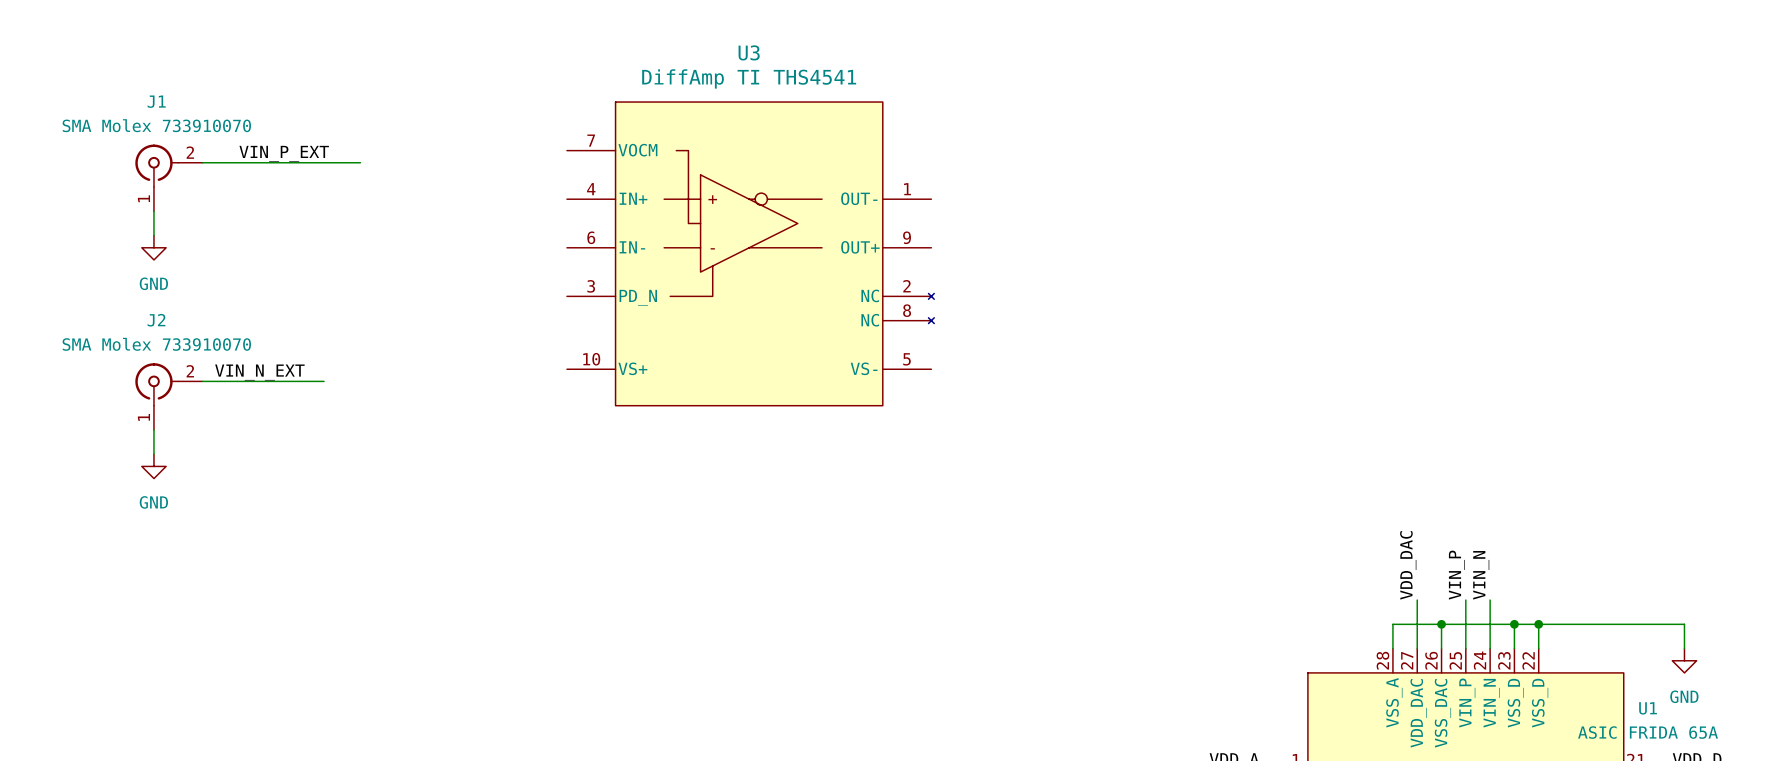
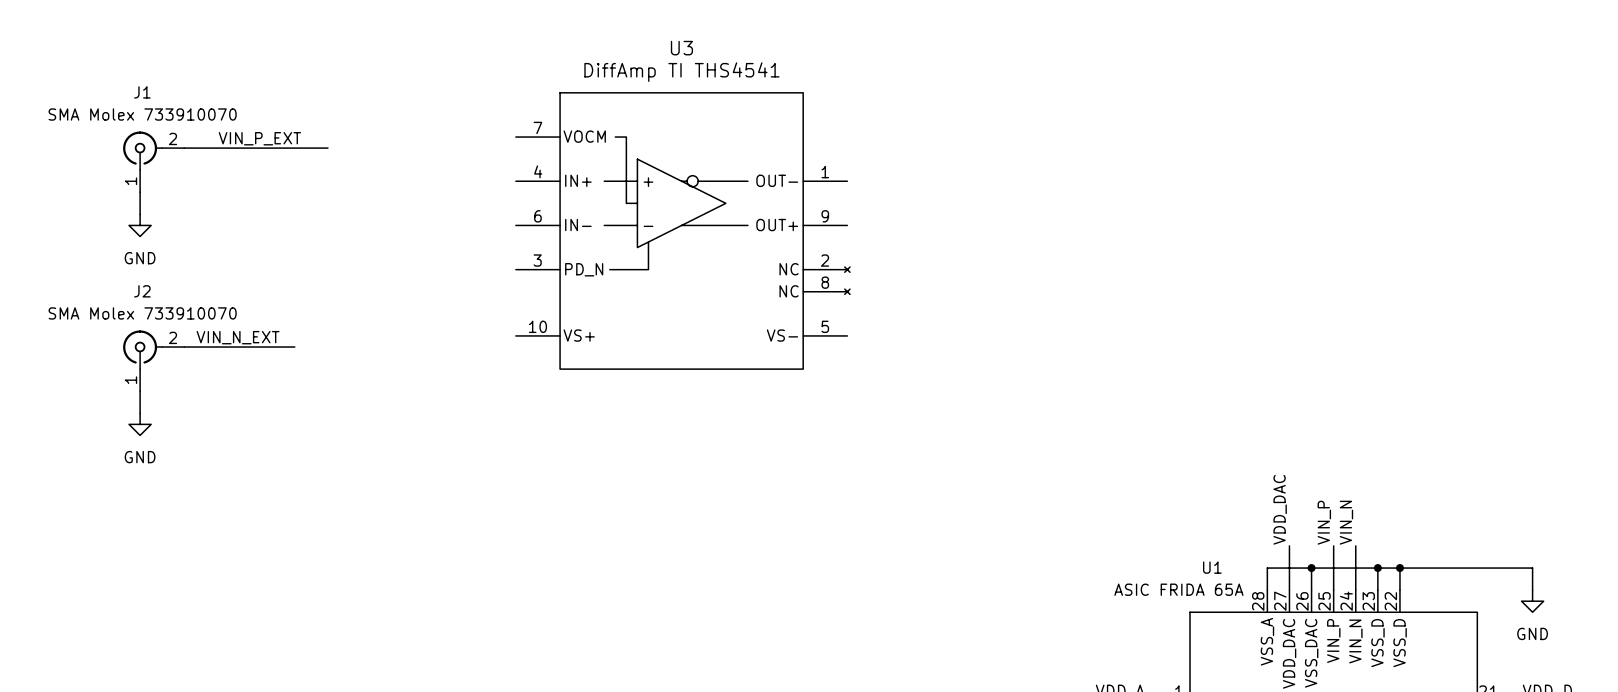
U1 name position: U1 (1648, 708) -> U1 (1212, 567)
U1 value position: ASIC FRIDA 65A (1648, 732) -> ASIC FRIDA 65A (1178, 589)

